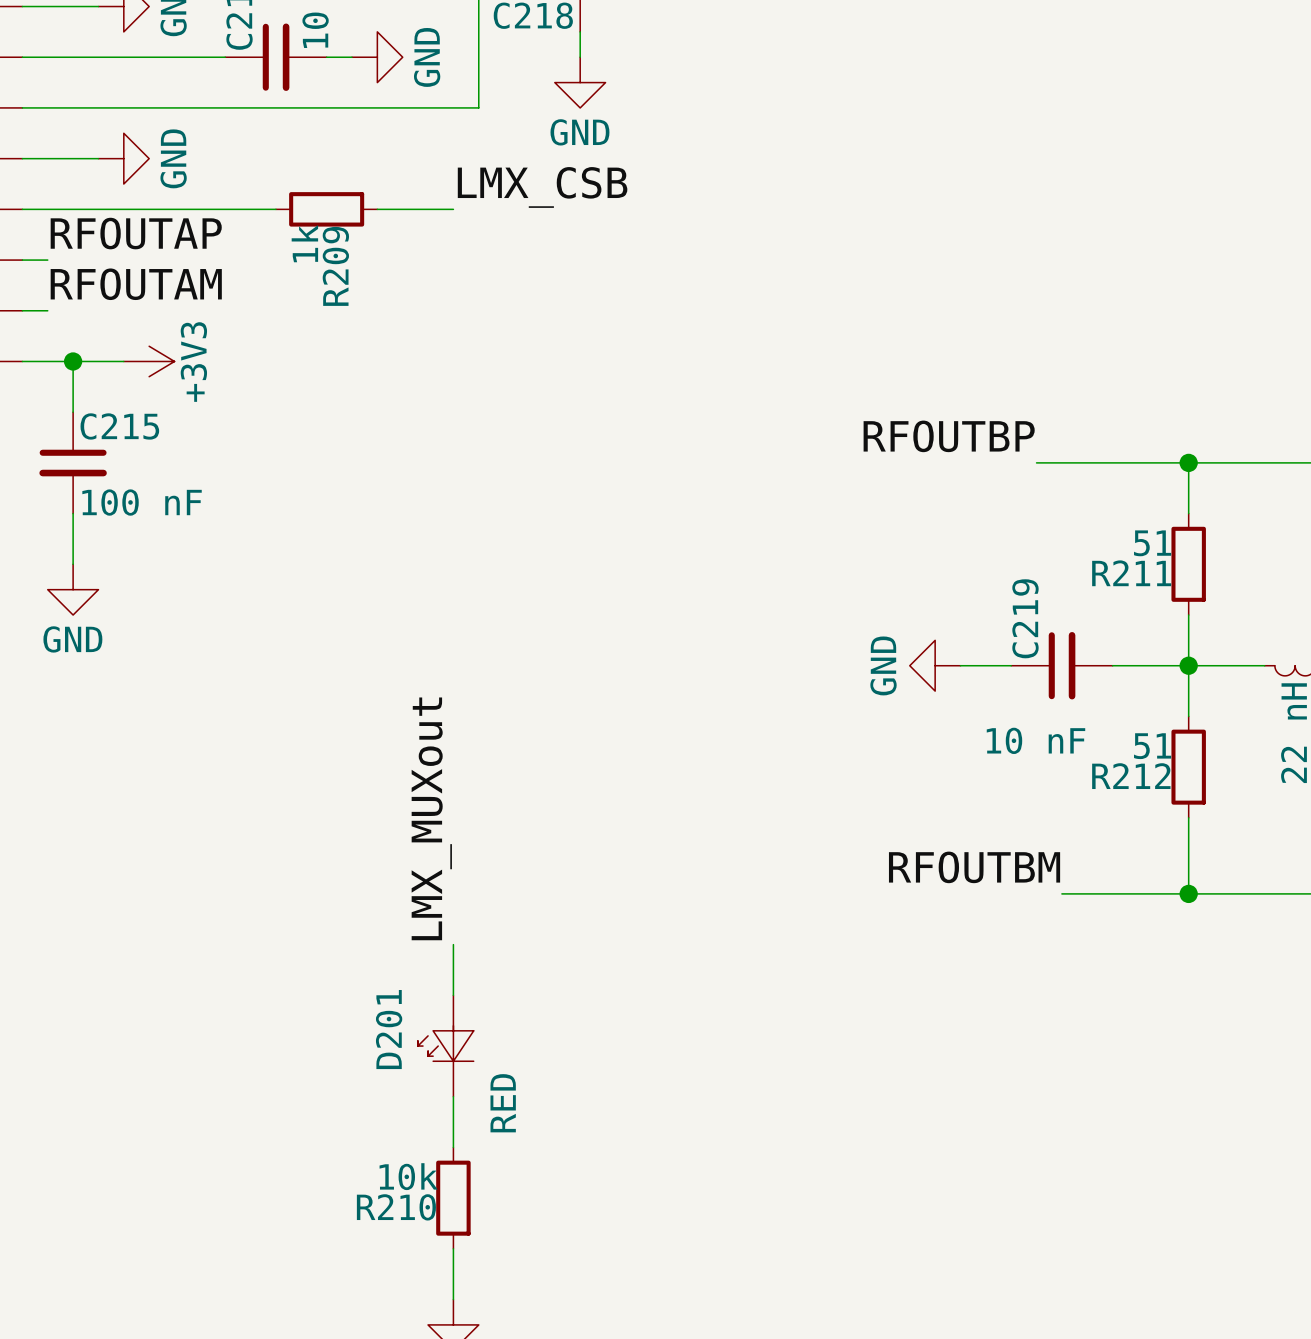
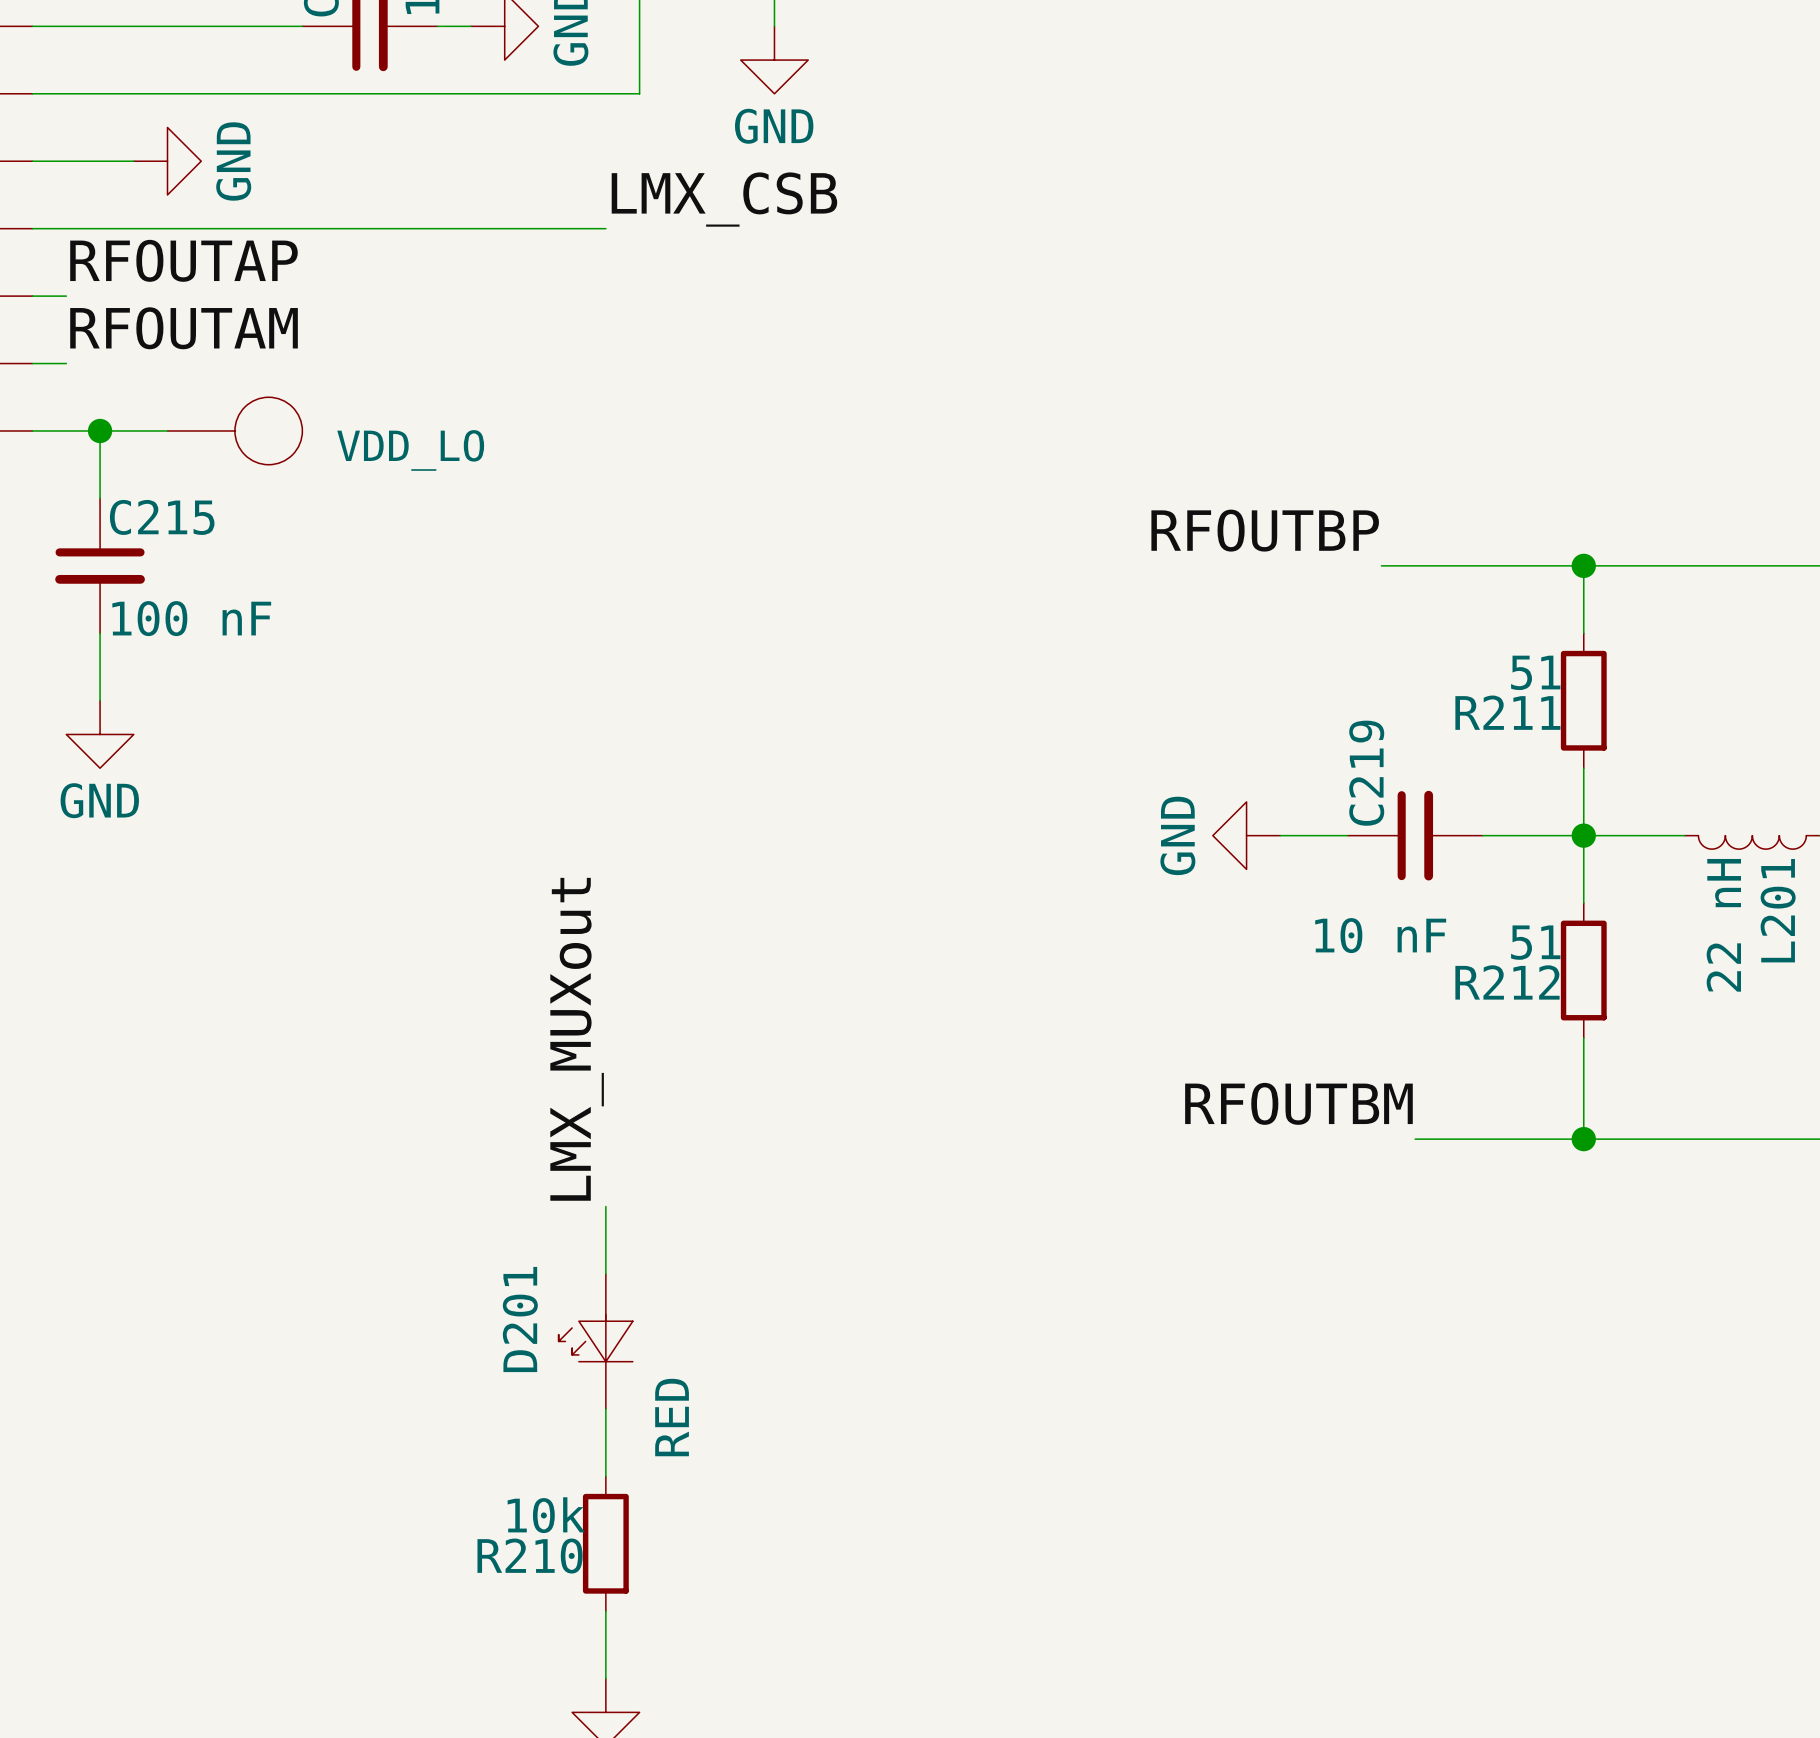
wire: none -> (369, 228) (504, 228)
R209: 1k (326, 209) -> none
power symbol: +3V3 (149, 361) -> none
power symbol: none -> VDD_LO (234, 430)

